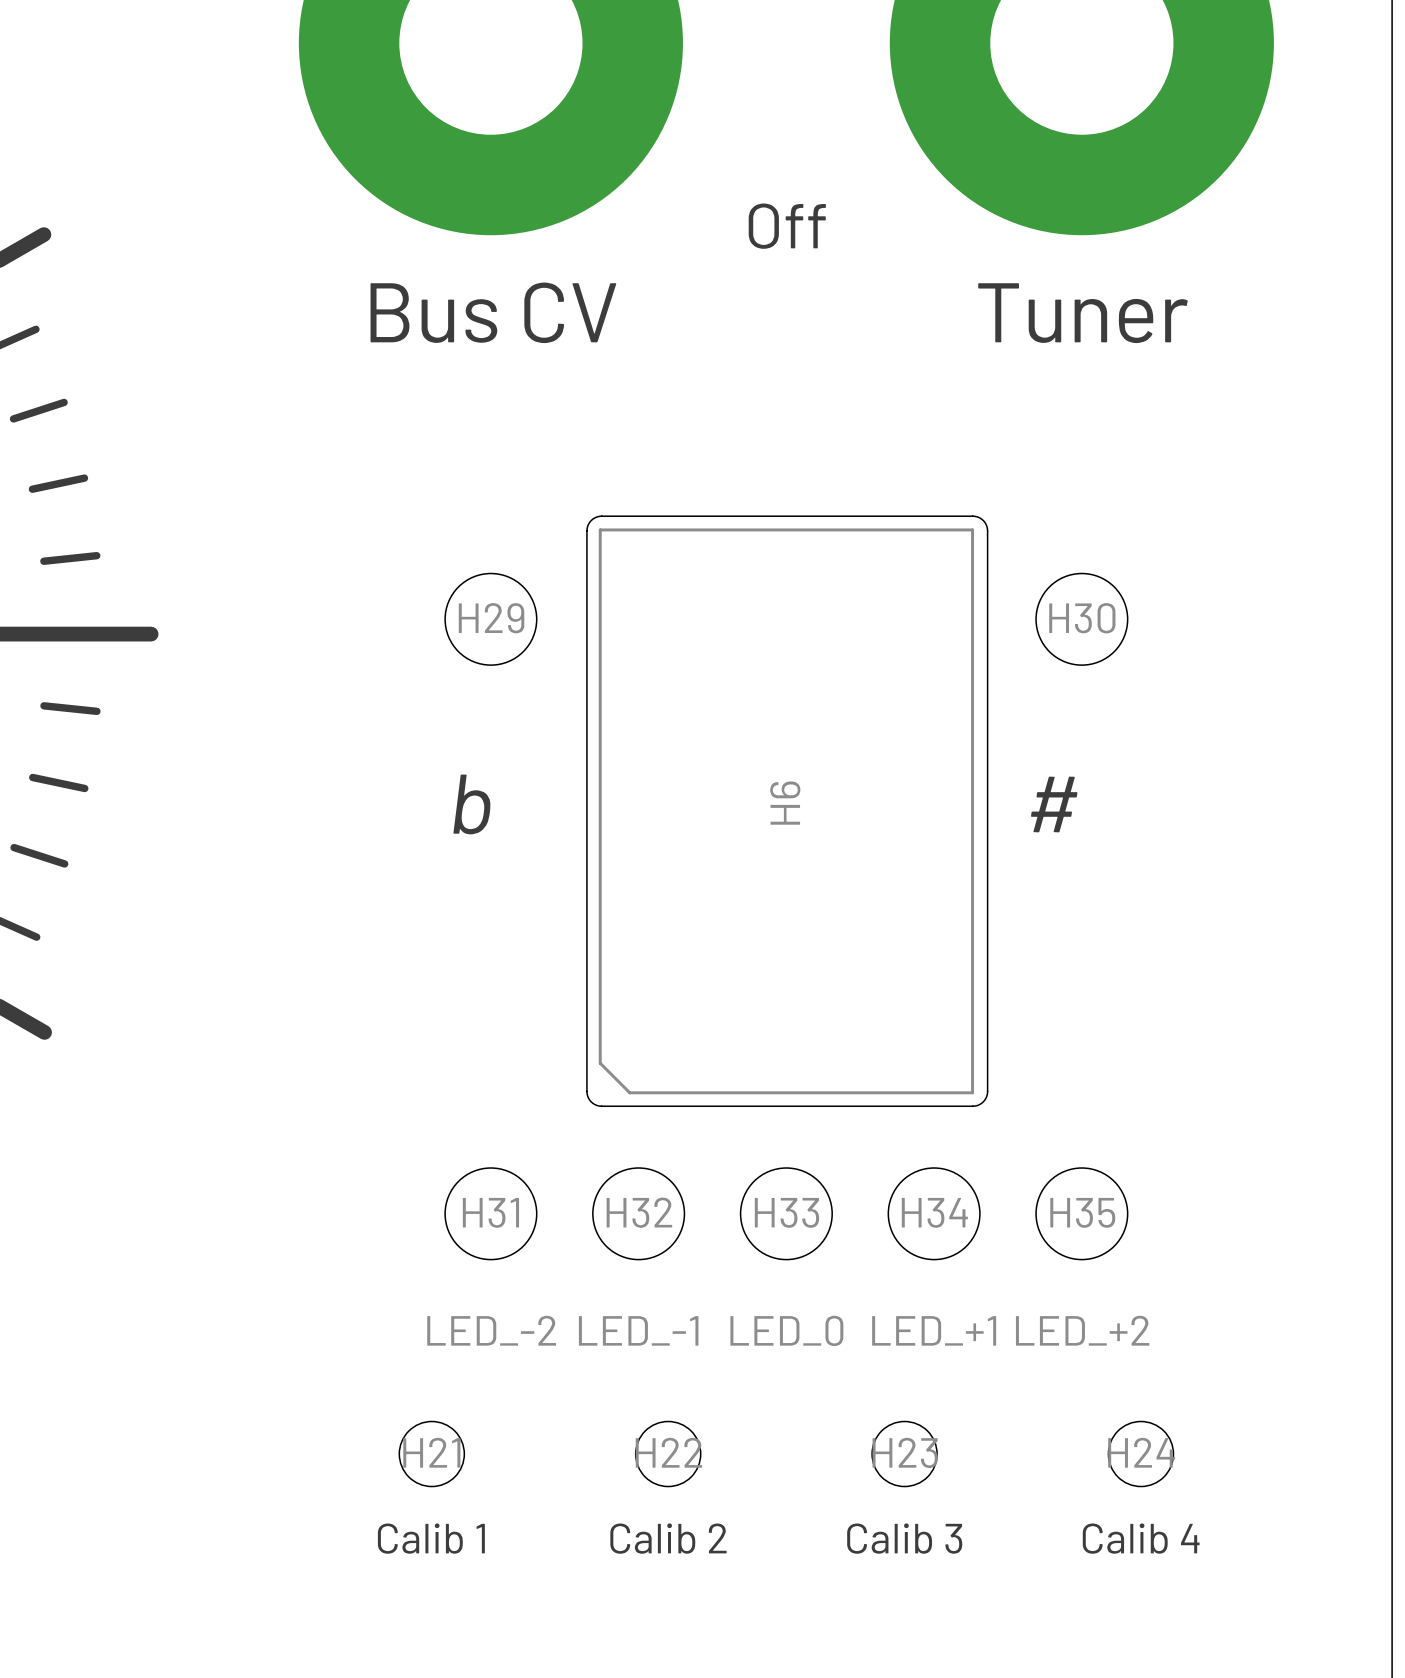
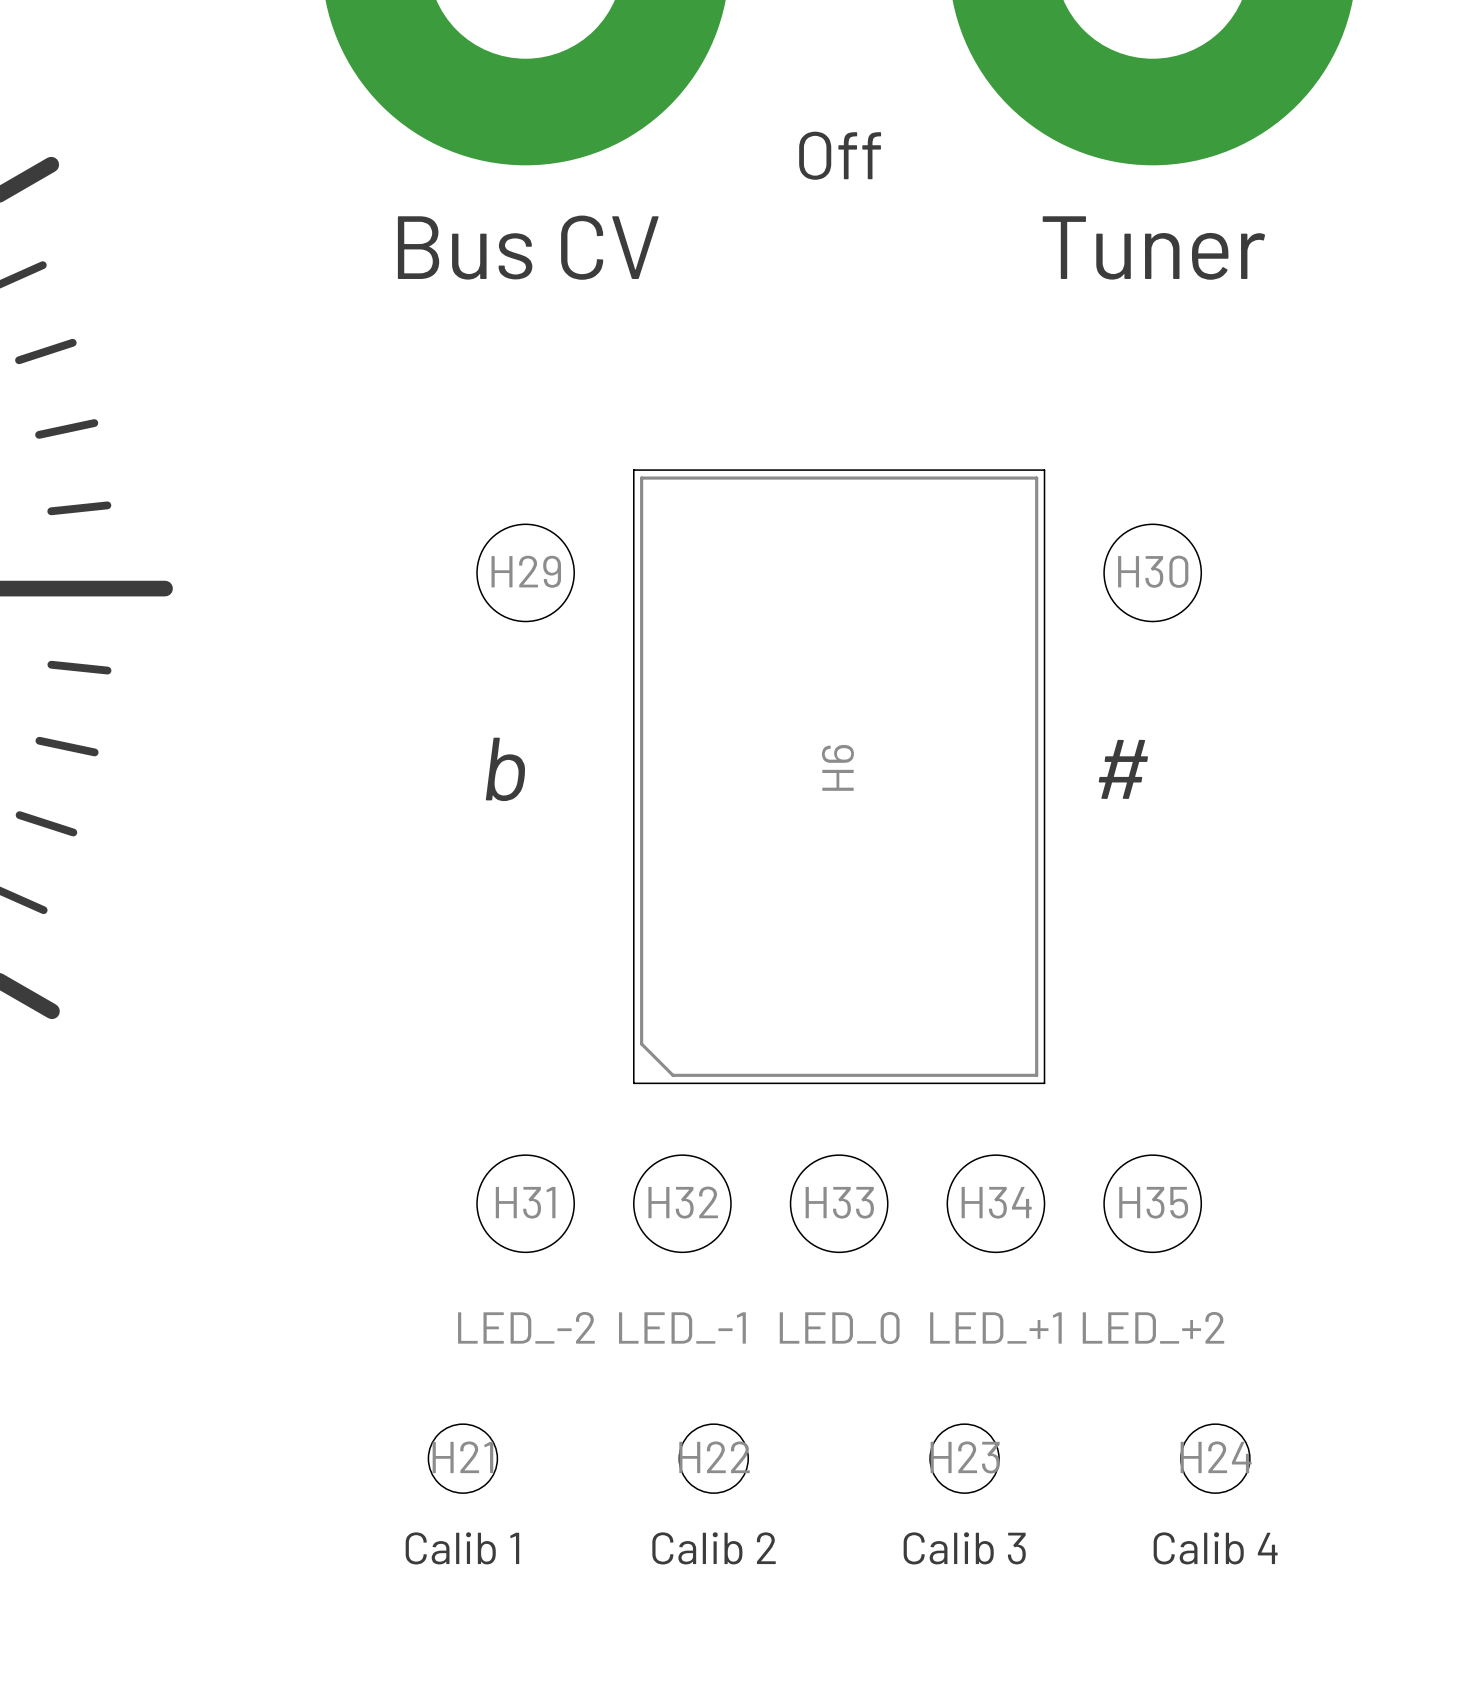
H6 footprint: [586, 515, 989, 1107] -> [633, 469, 1046, 1085]

